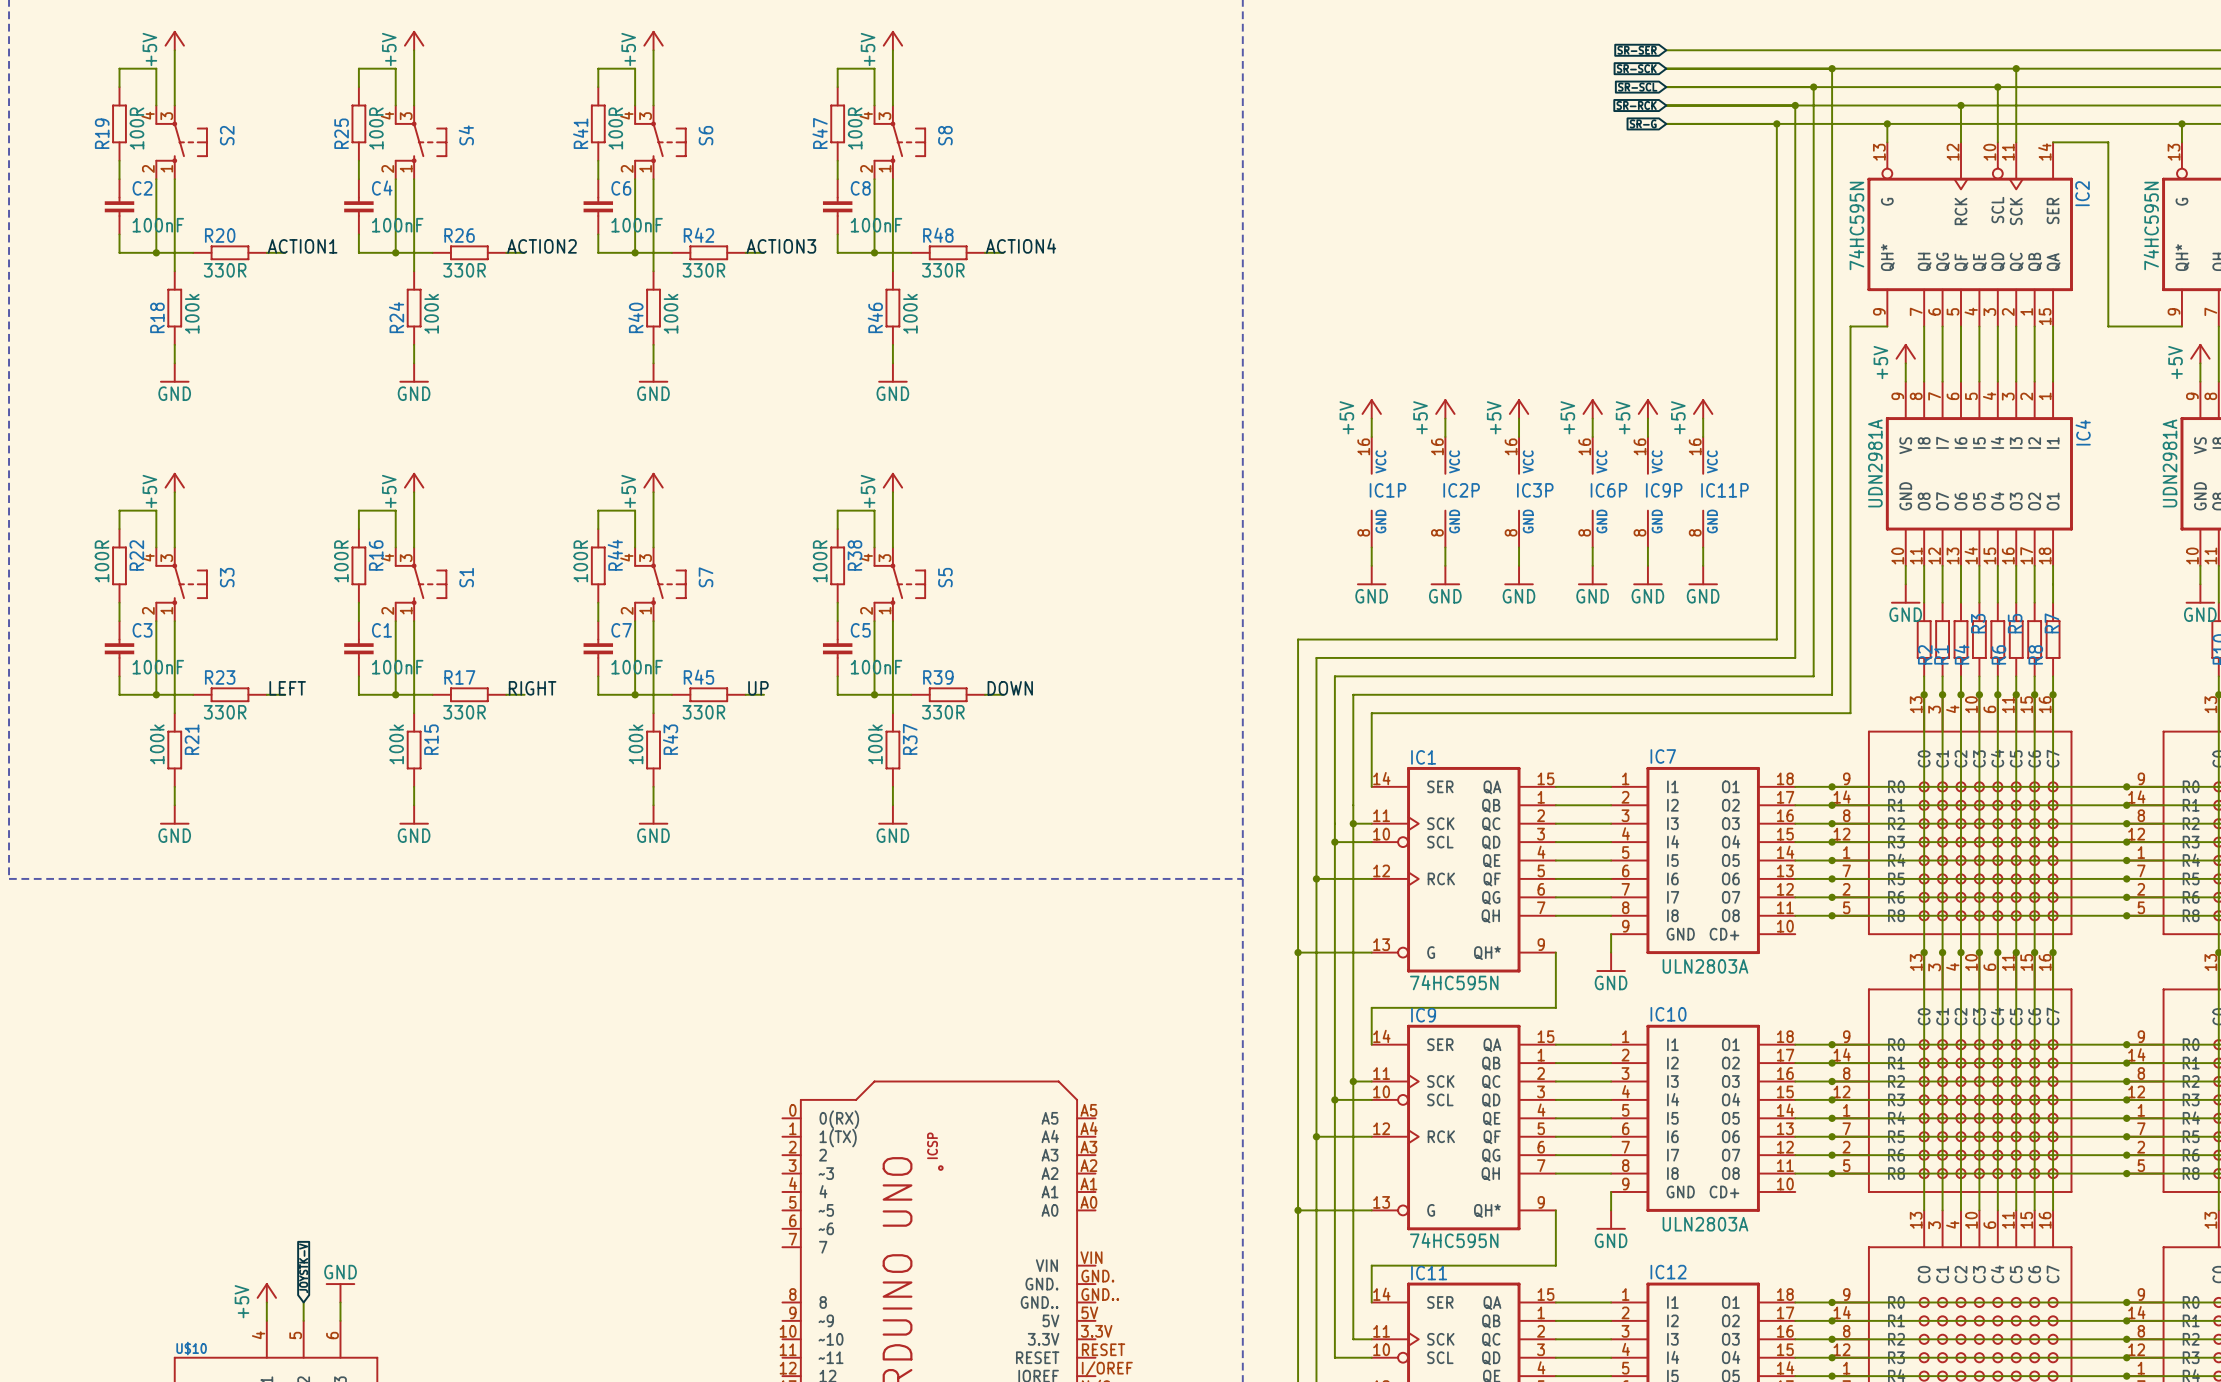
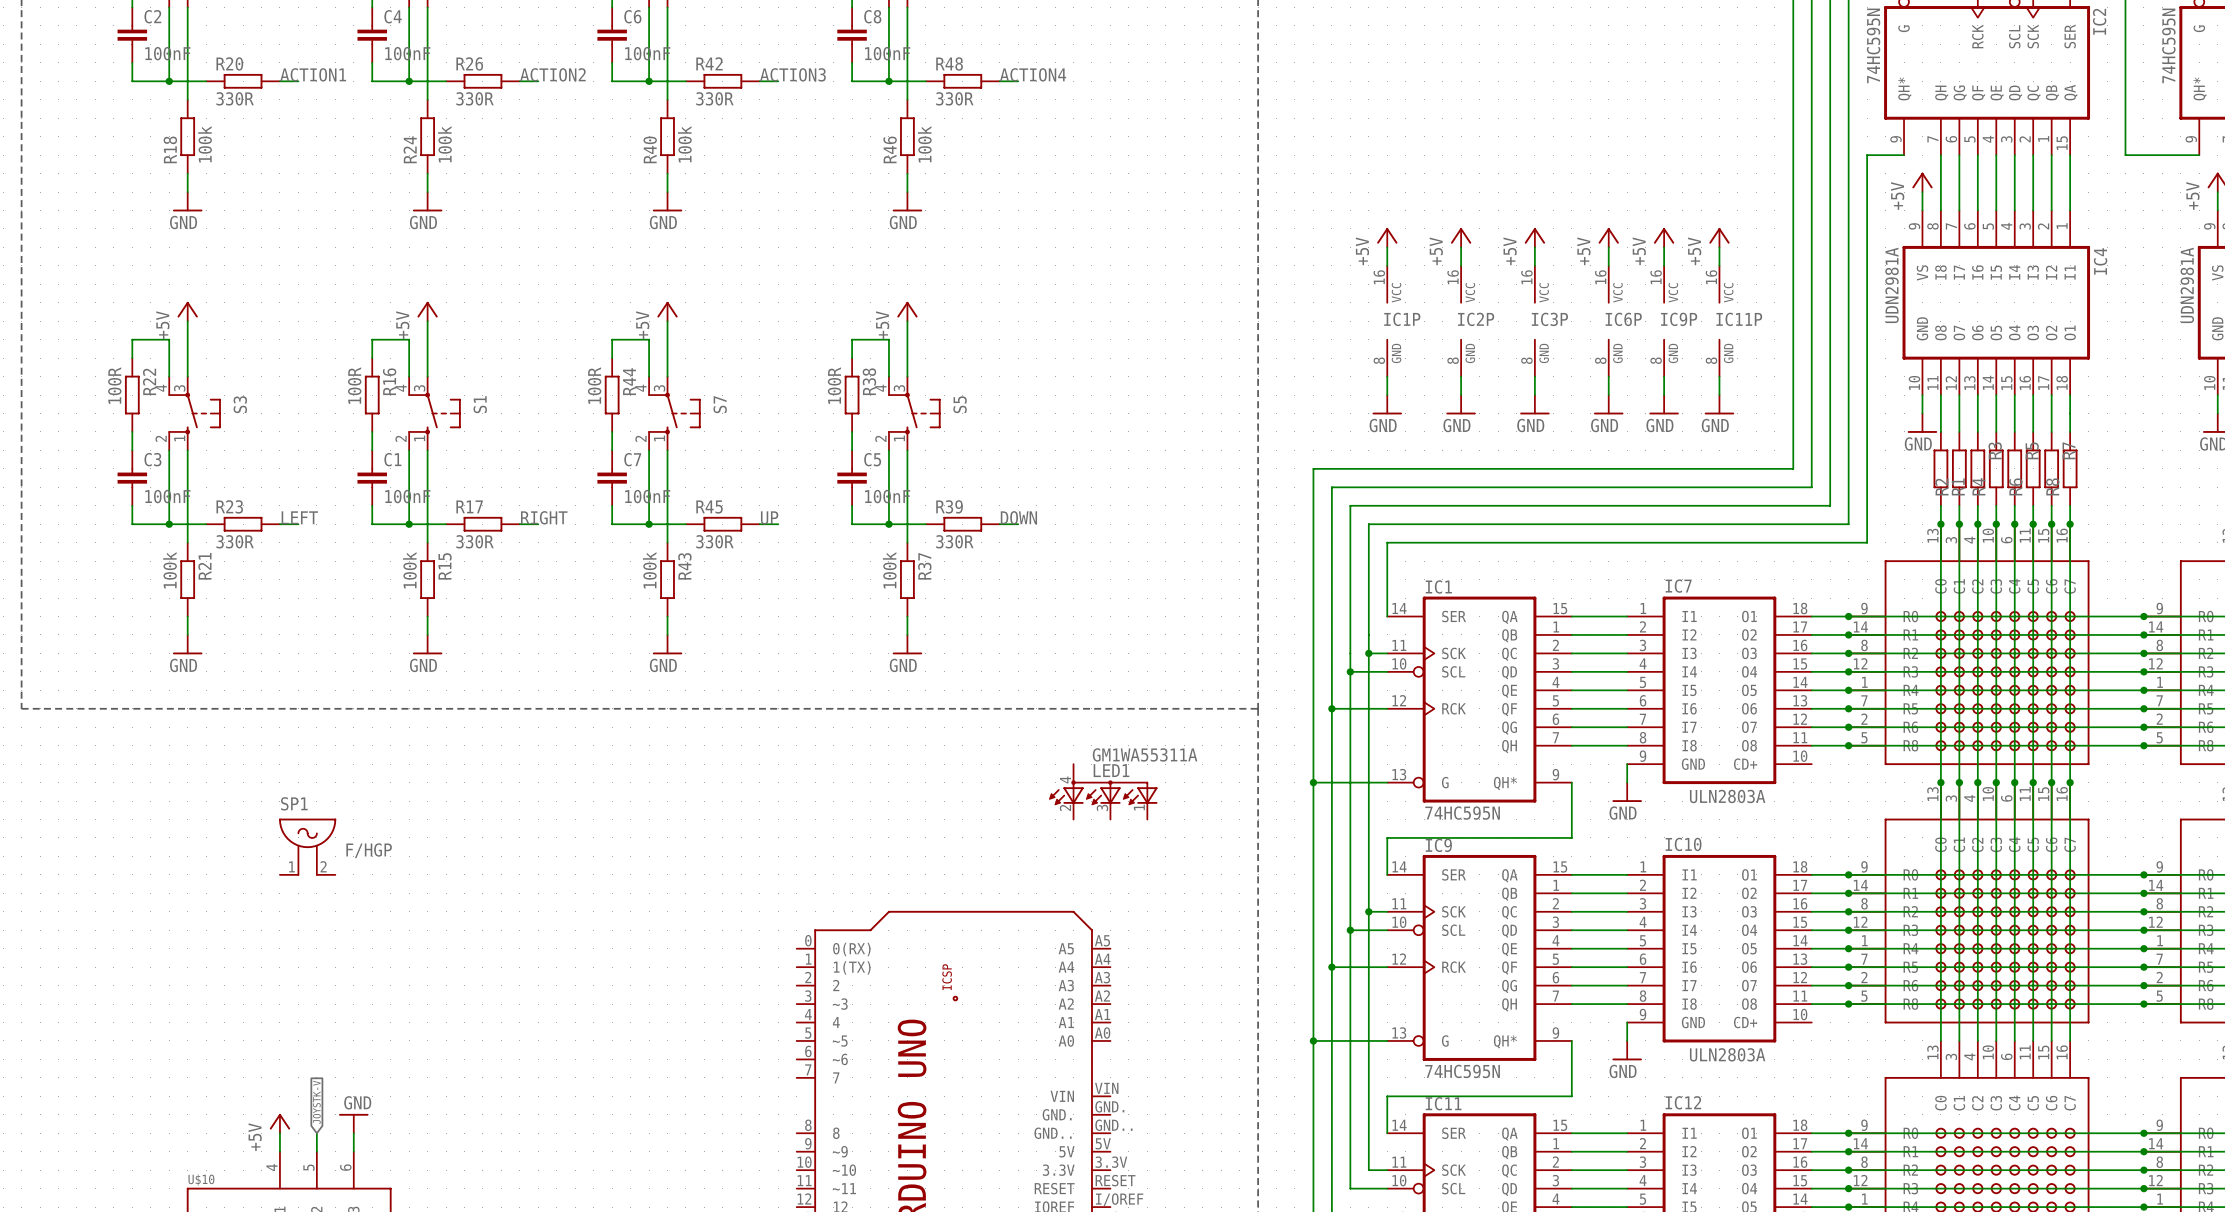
LED1: none -> GM1WA55311A (1103, 791)
SP1: none -> F/HGP (307, 847)

